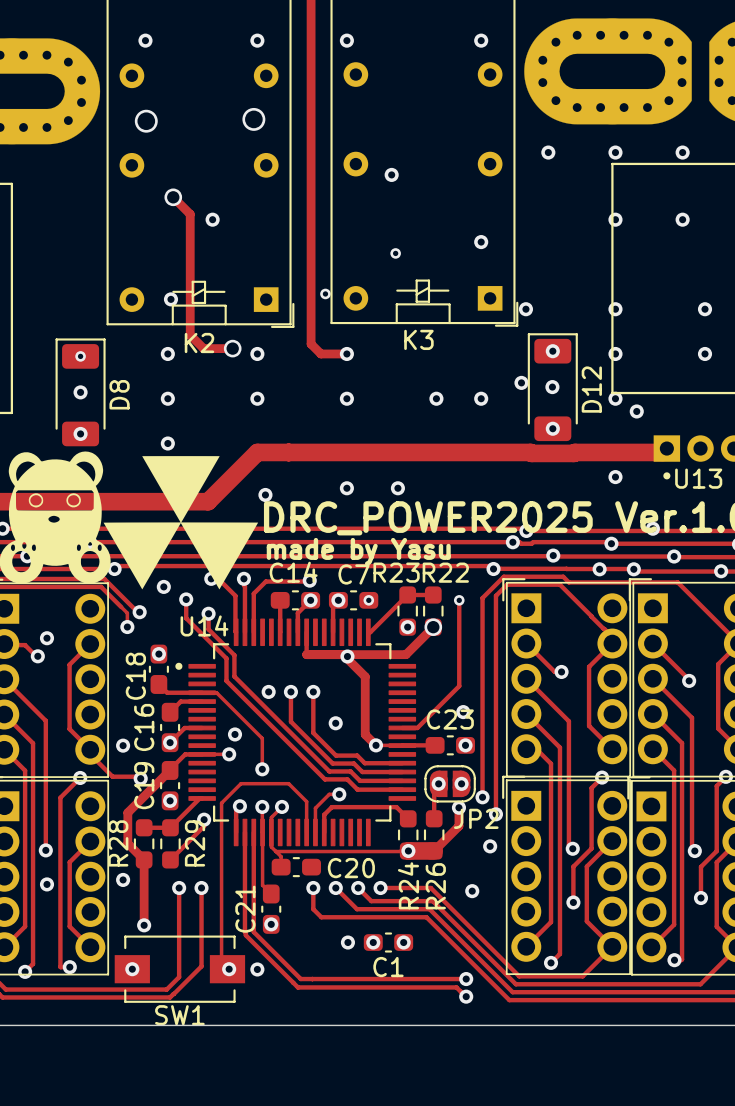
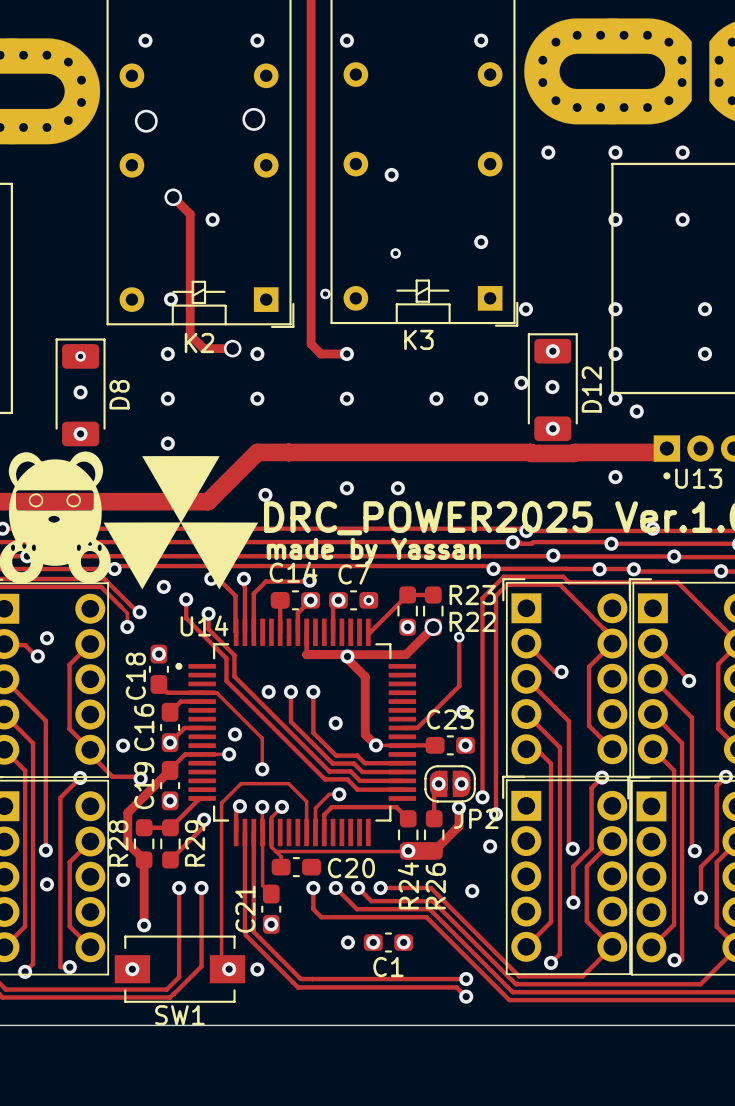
text: made by Yasu (358, 551) -> made by Yassan (373, 551)
R23 name position: R23 (396, 572) -> R23 (472, 595)
R22 name position: R22 (445, 572) -> R22 (472, 621)
track: (459, 600) (459, 637) -> none
via position: (459, 600) -> (459, 637)

